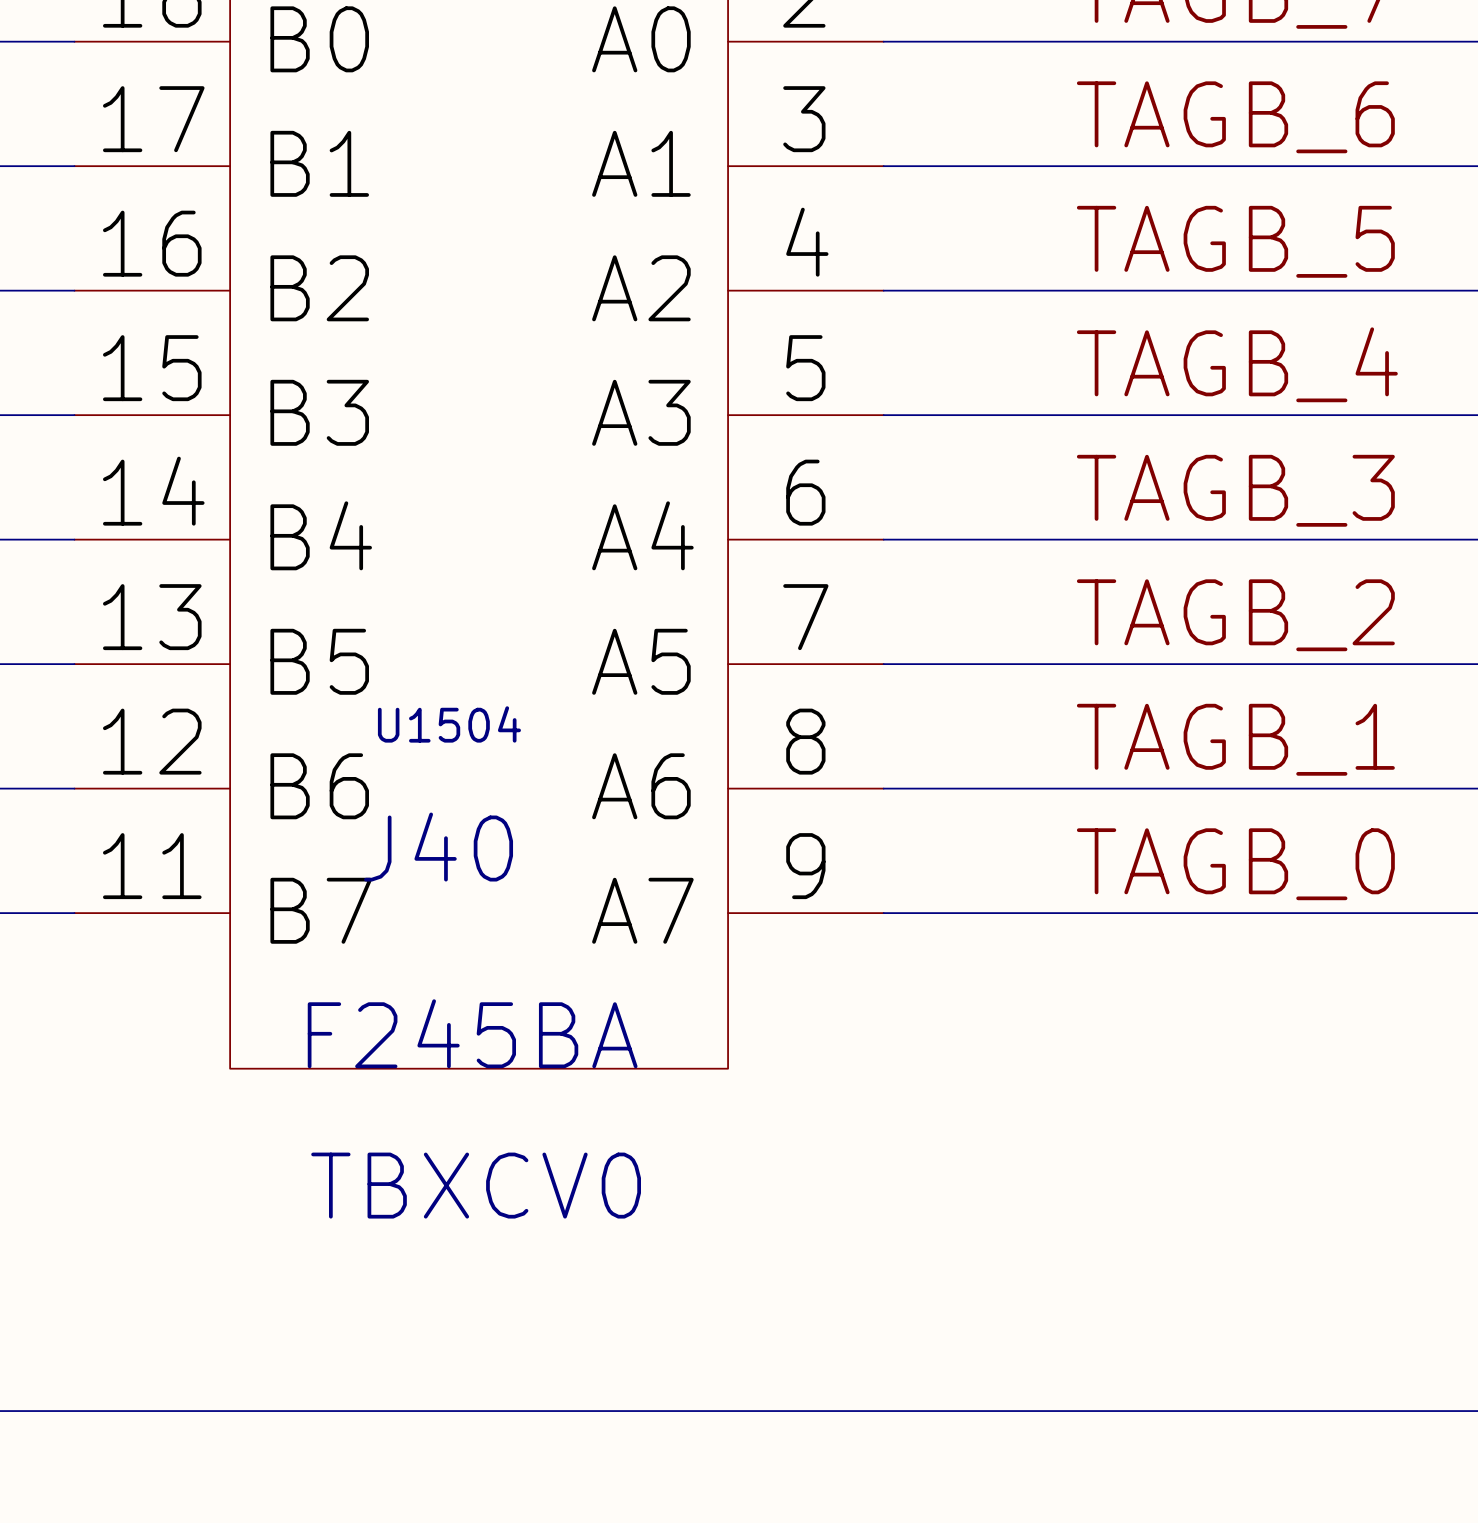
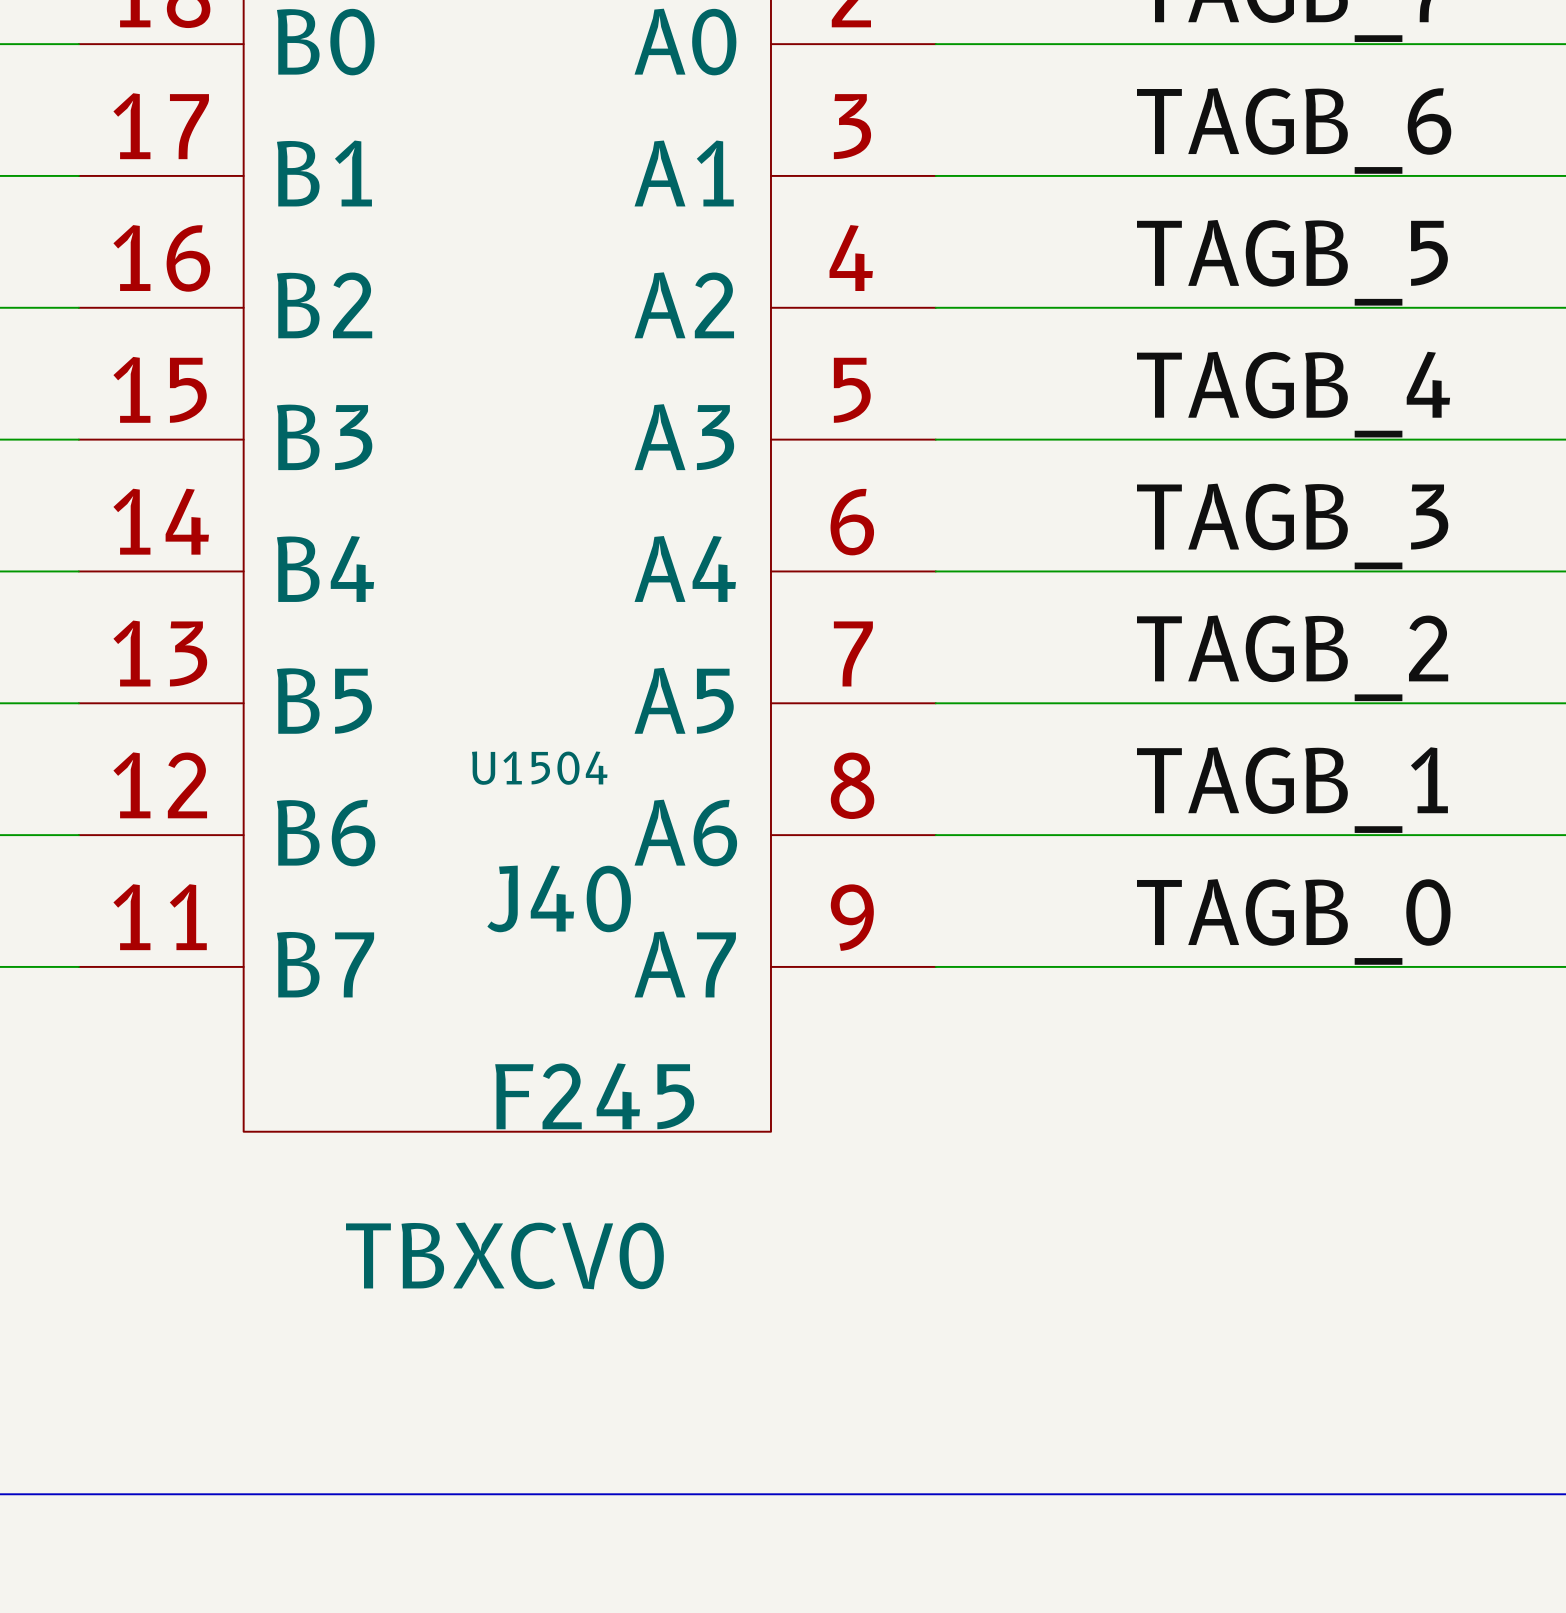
U1504 name position: U1504 (449, 724) -> U1504 (539, 768)
U1504 text position: J40 (438, 847) -> J40 (559, 898)
U1504 value: F245BA (472, 1033) -> F245 (594, 1096)

